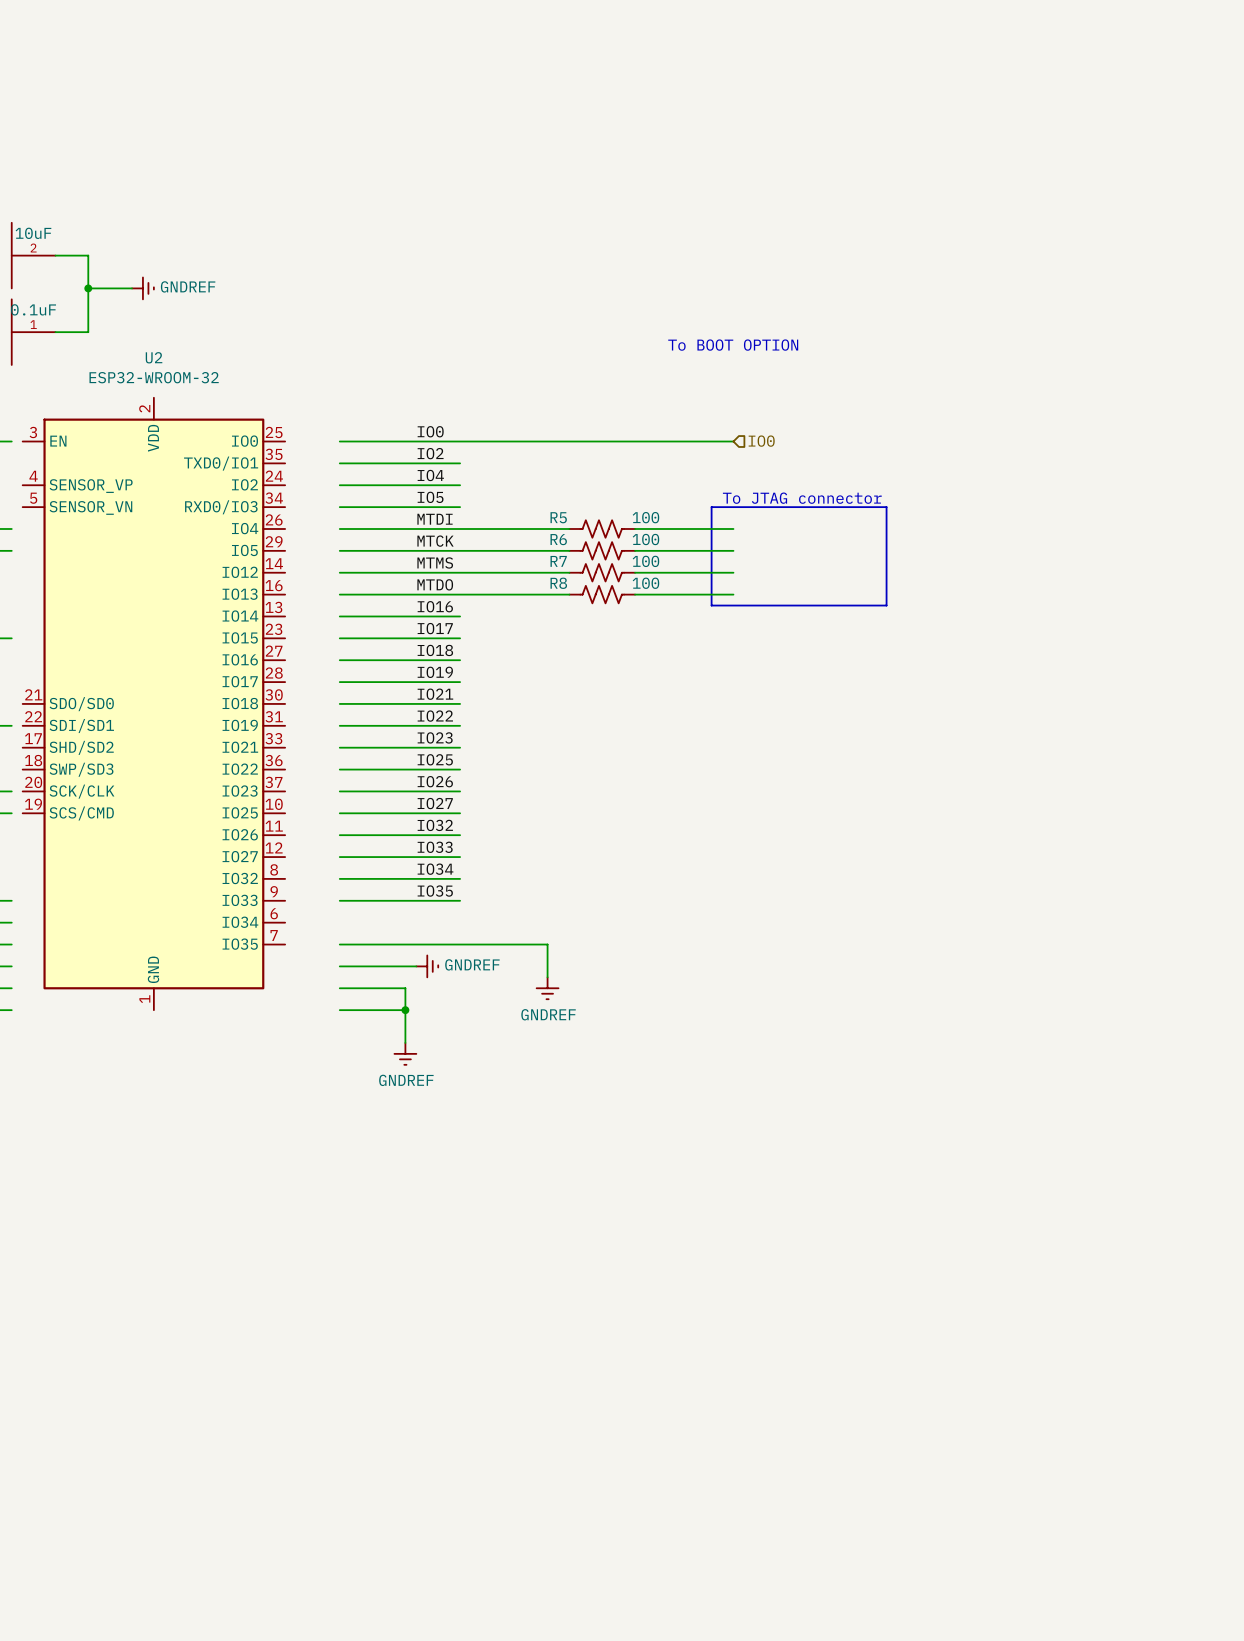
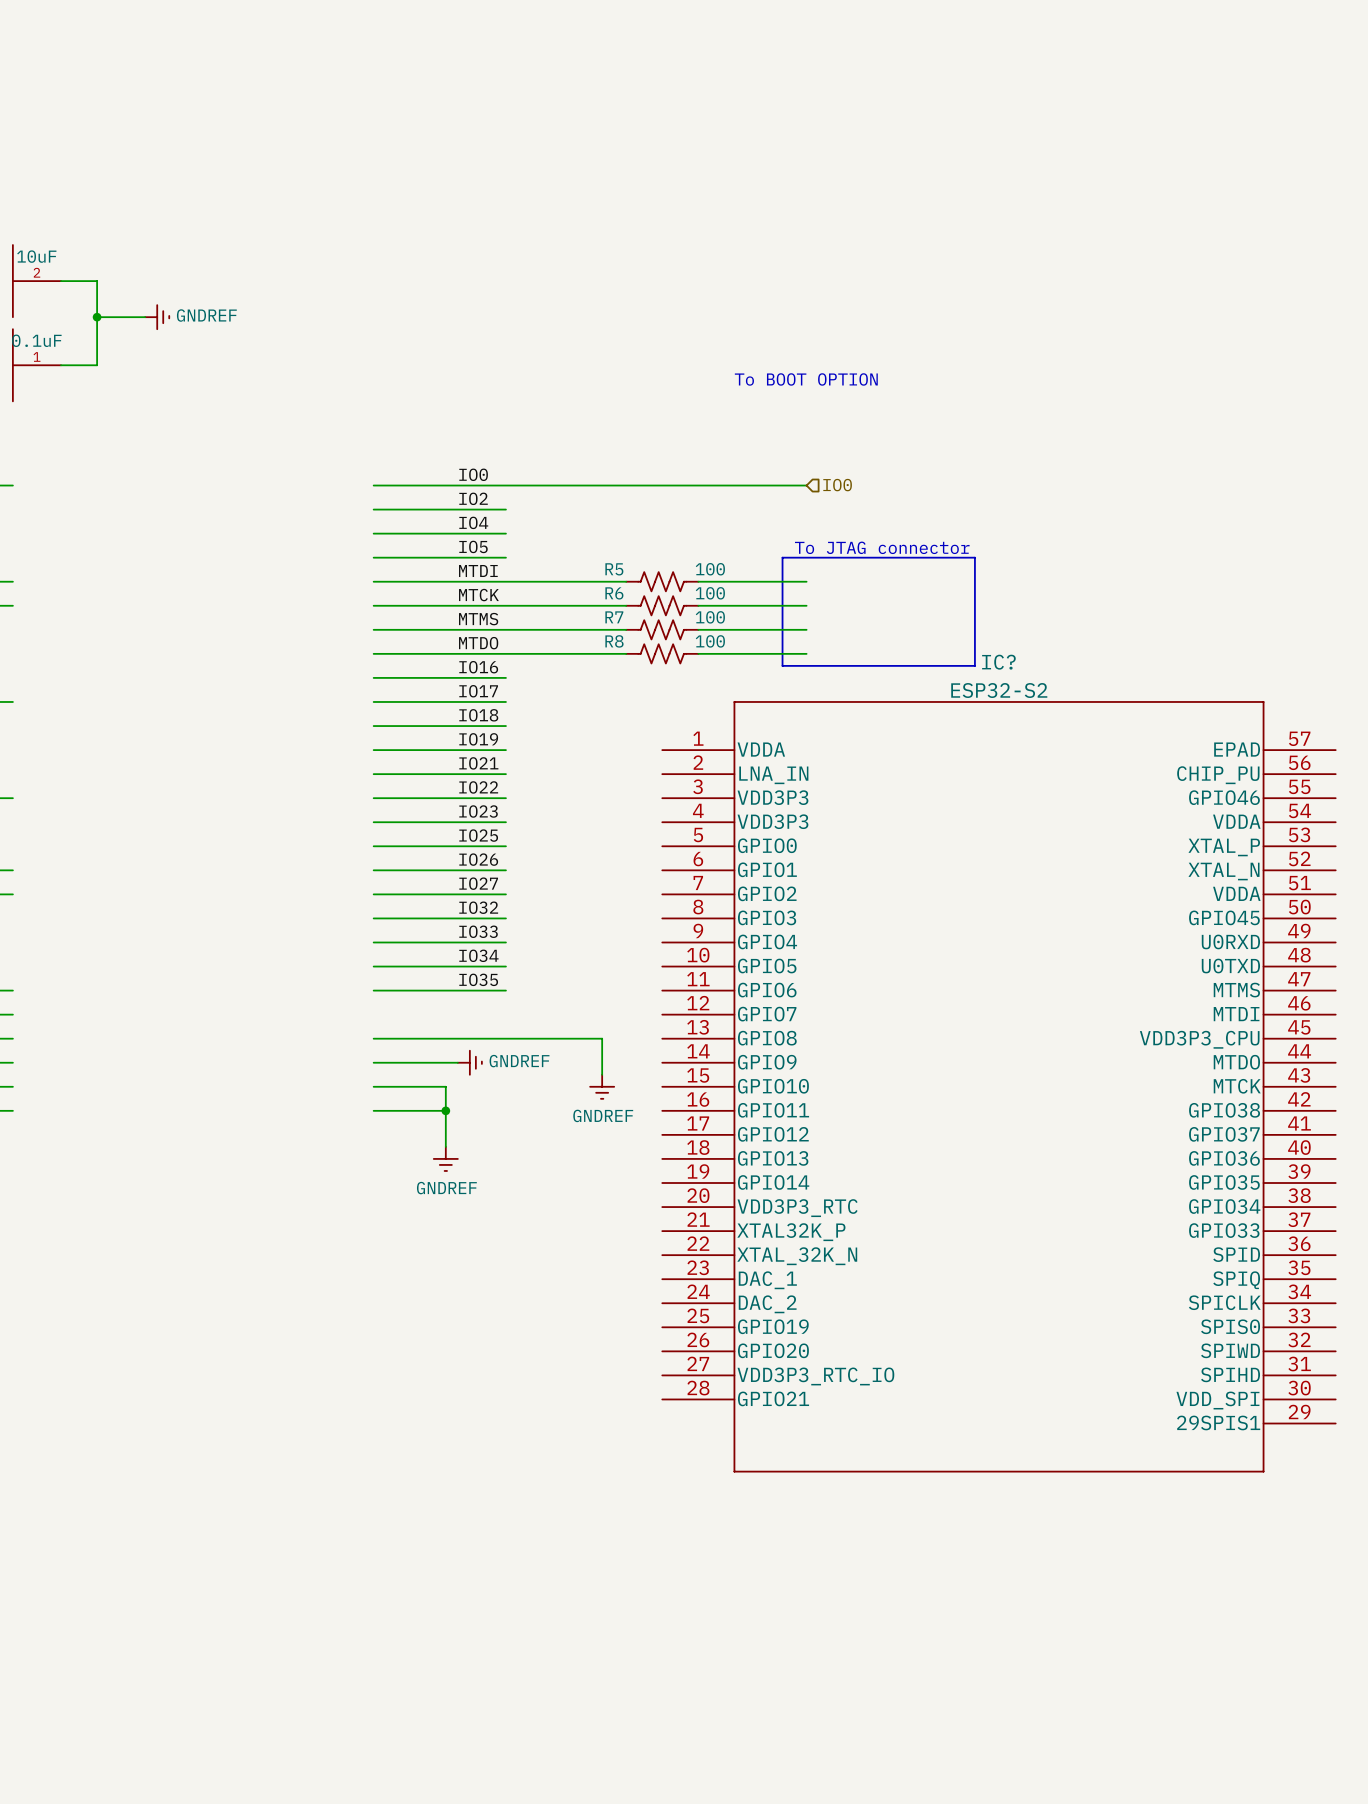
U2: ESP32-WROOM-32 (153, 703) -> none
IC?: none -> ESP32-S2 (998, 1086)

